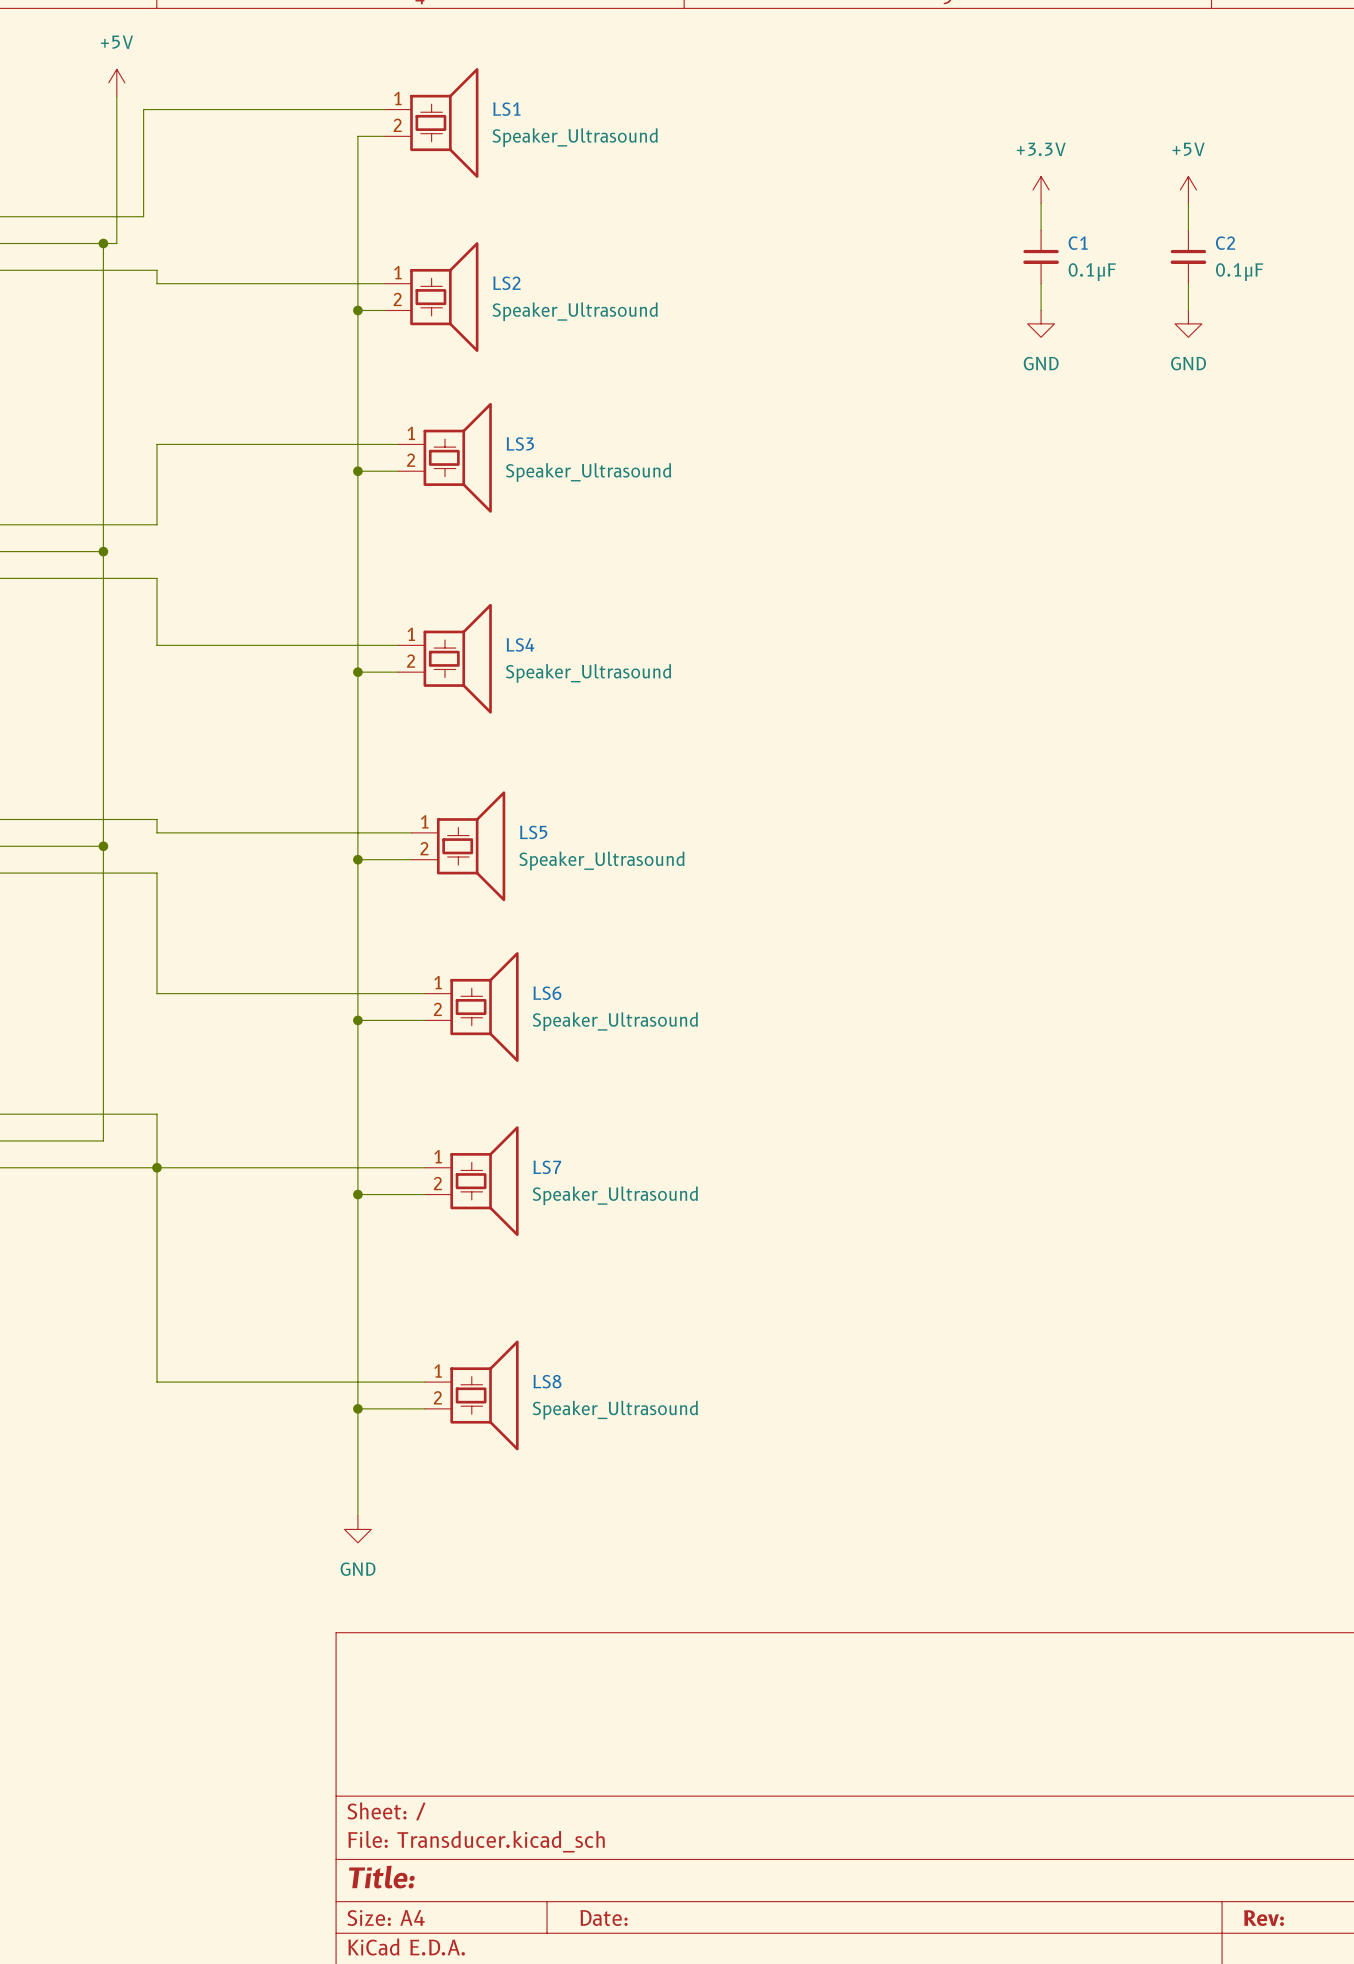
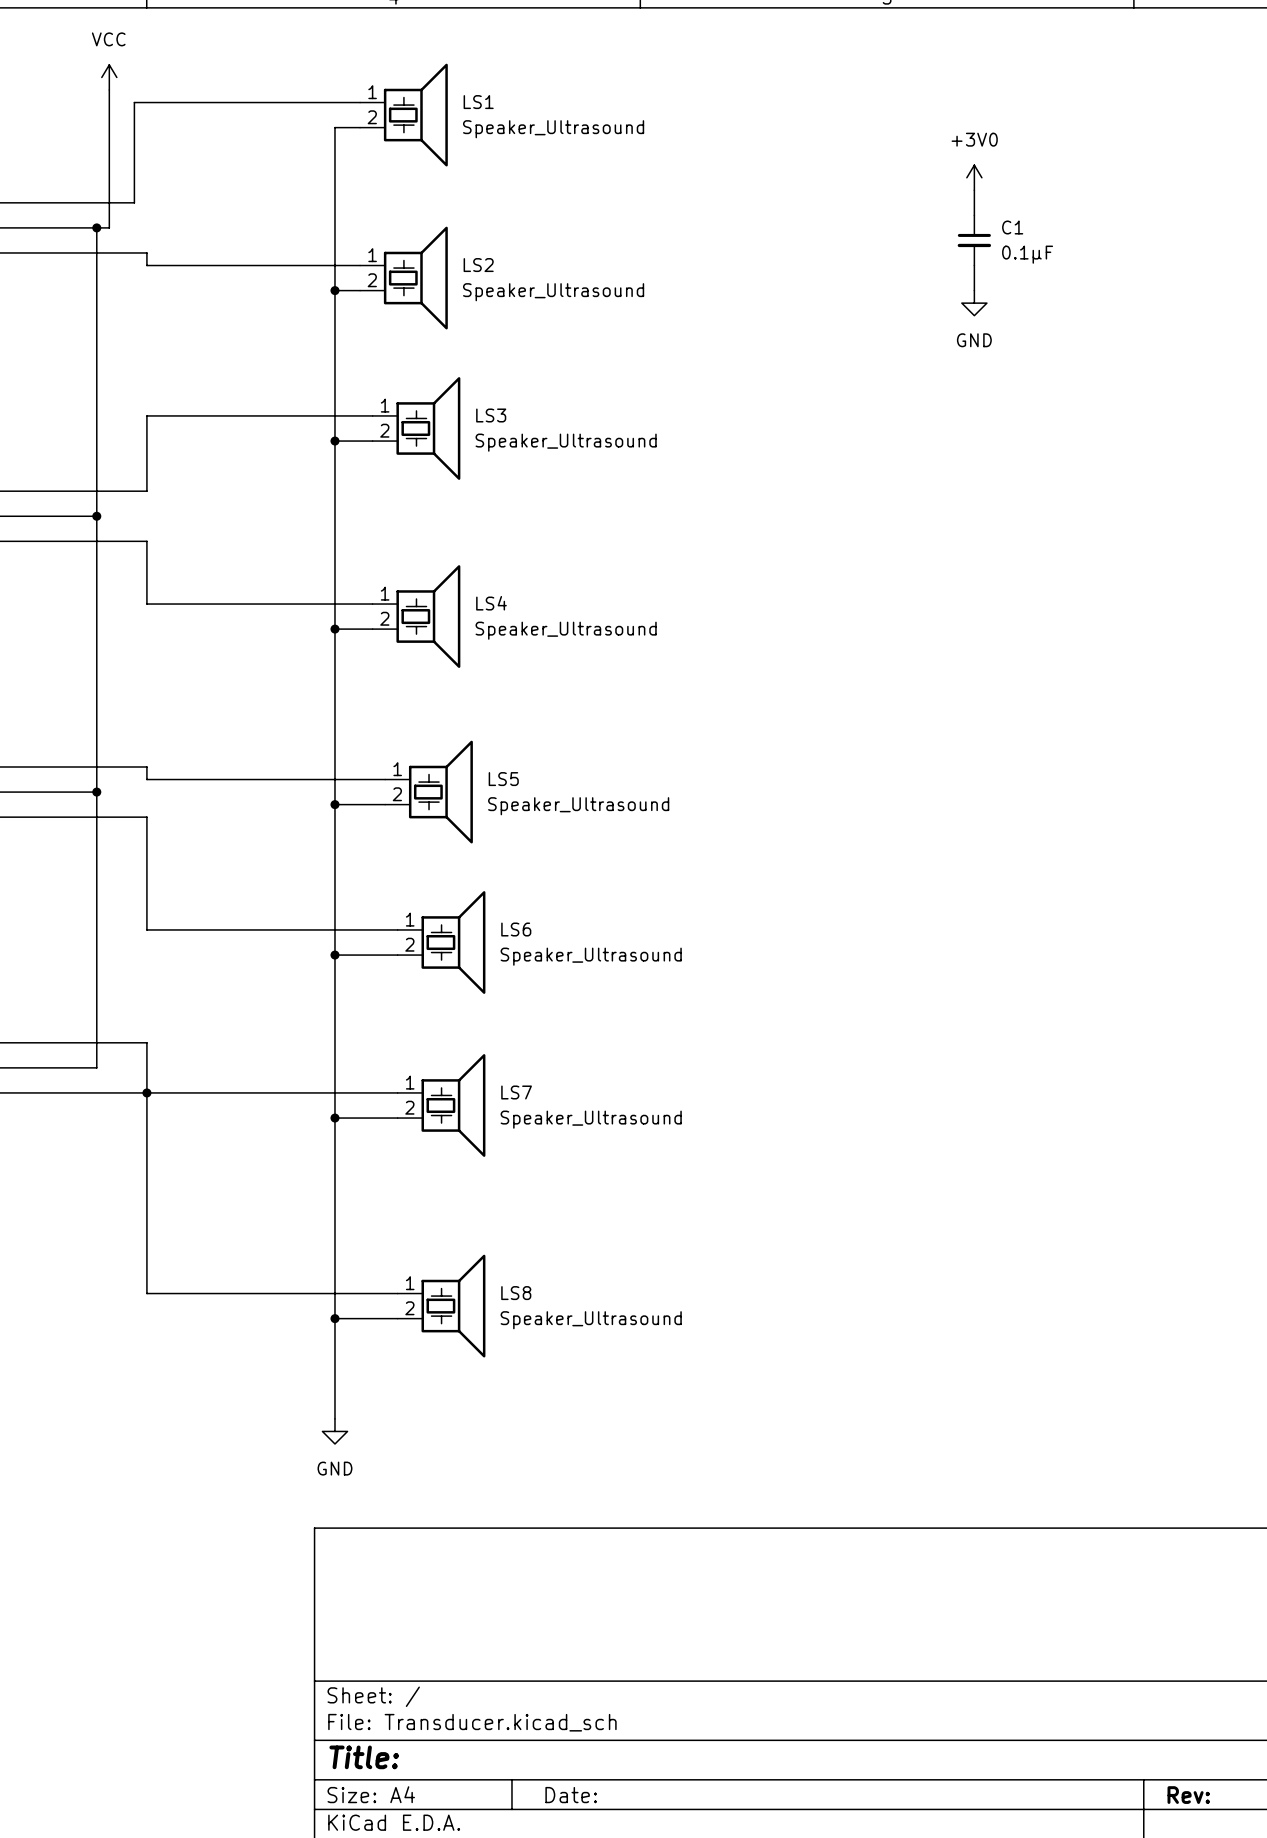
power symbol: +5V (116, 82) -> VCC (109, 77)
power symbol: +3.3V (1041, 189) -> +3V0 (974, 177)
power symbol: +5V (1188, 189) -> none
wire: (1188, 203) (1188, 230) -> none
C2: 0.1μF (1188, 256) -> none
wire: (1188, 283) (1188, 310) -> none
power symbol: GND (1188, 323) -> none

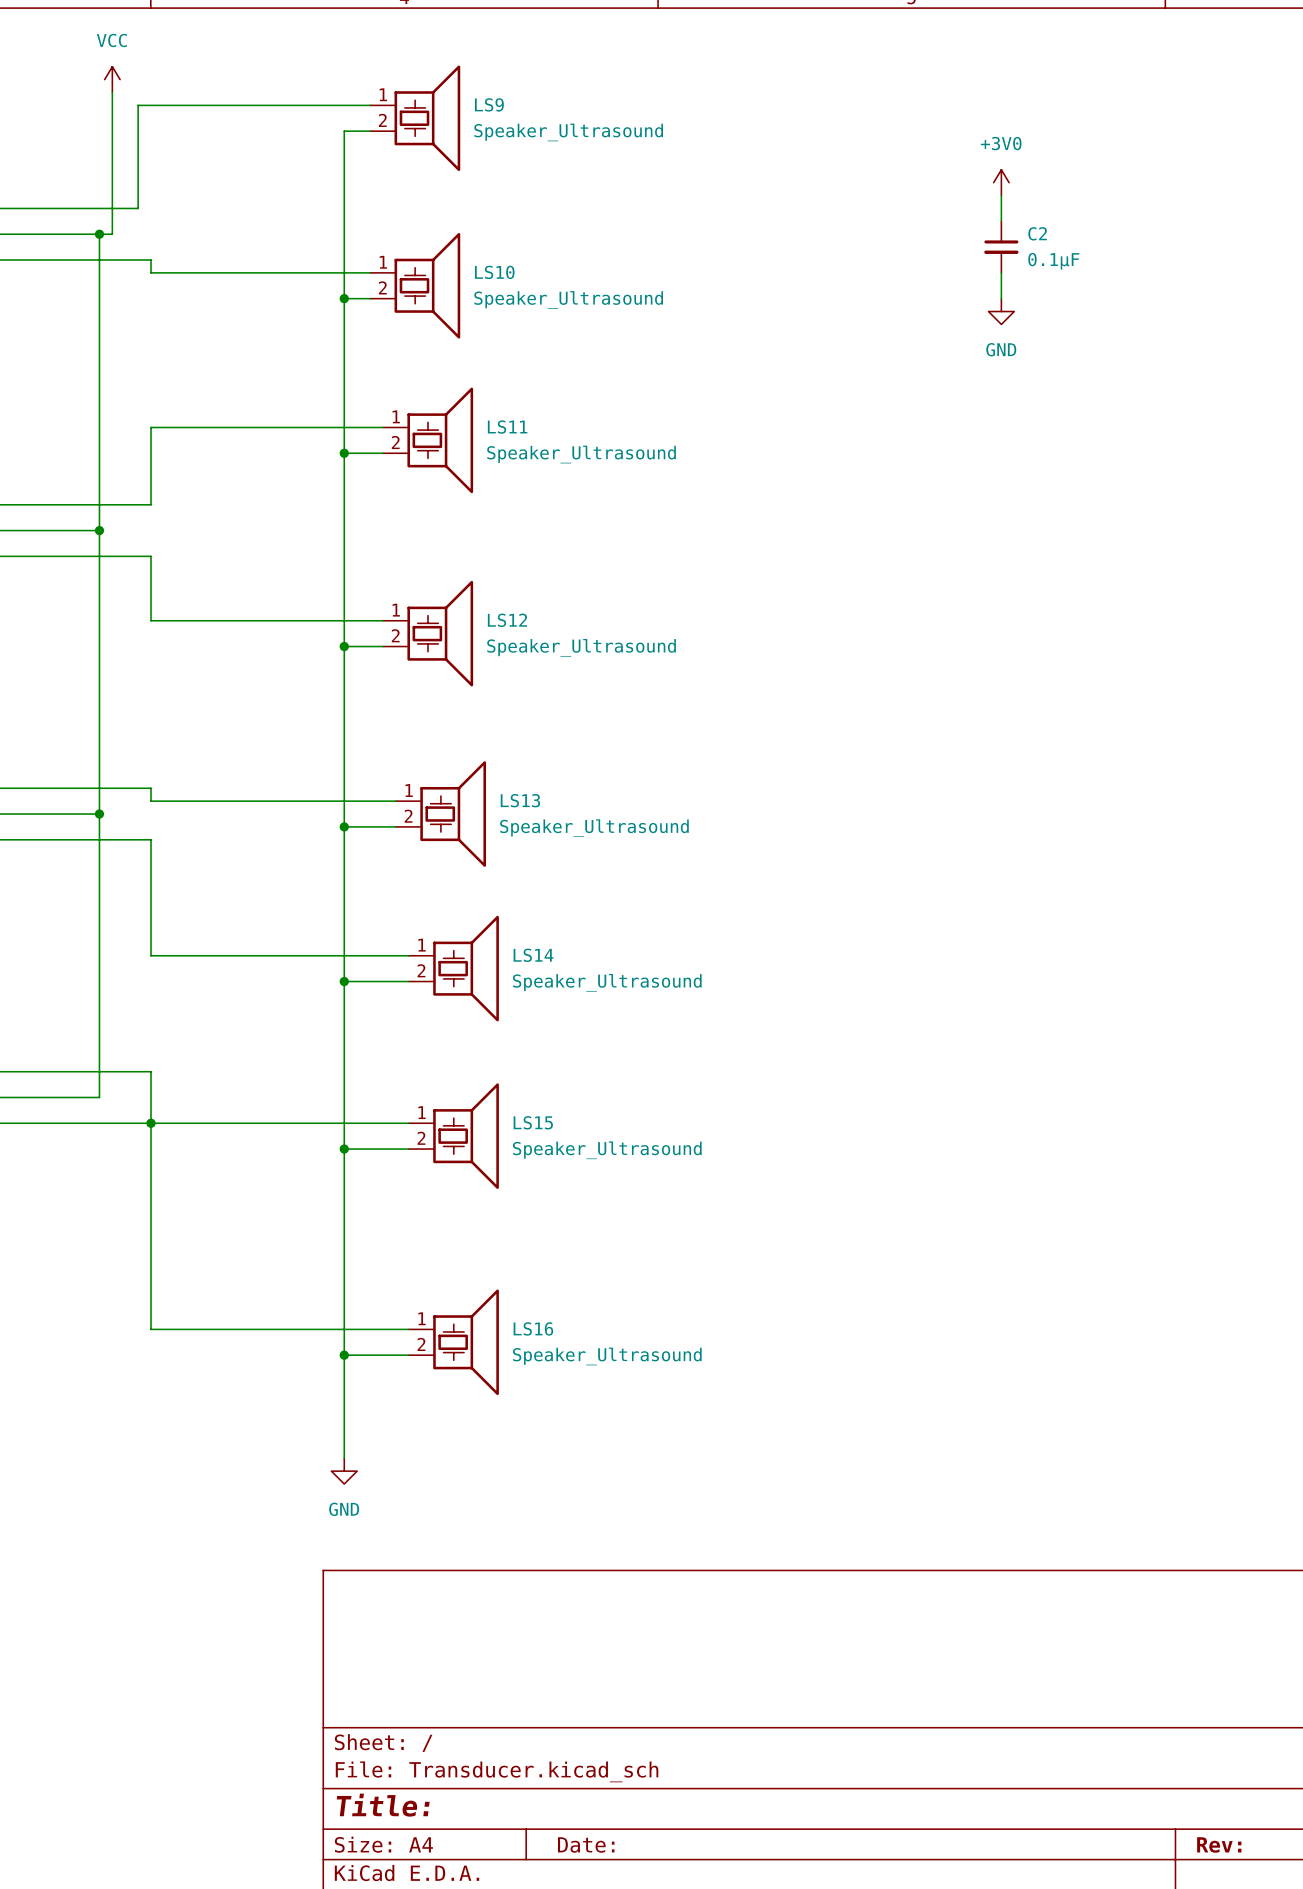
LS1 name: LS1 (478, 102) -> LS9 (489, 104)
C1 name: C1 (1012, 227) -> C2 (1037, 233)
LS2 name: LS2 (478, 265) -> LS10 (494, 272)
LS3 name: LS3 (491, 415) -> LS11 (507, 427)
LS4 name: LS4 (491, 603) -> LS12 (507, 620)
LS5 name: LS5 (503, 779) -> LS13 (520, 800)
LS6 name: LS6 (516, 929) -> LS14 (533, 955)
LS7 name: LS7 (516, 1092) -> LS15 (533, 1122)
LS8 name: LS8 (516, 1293) -> LS16 (533, 1328)

